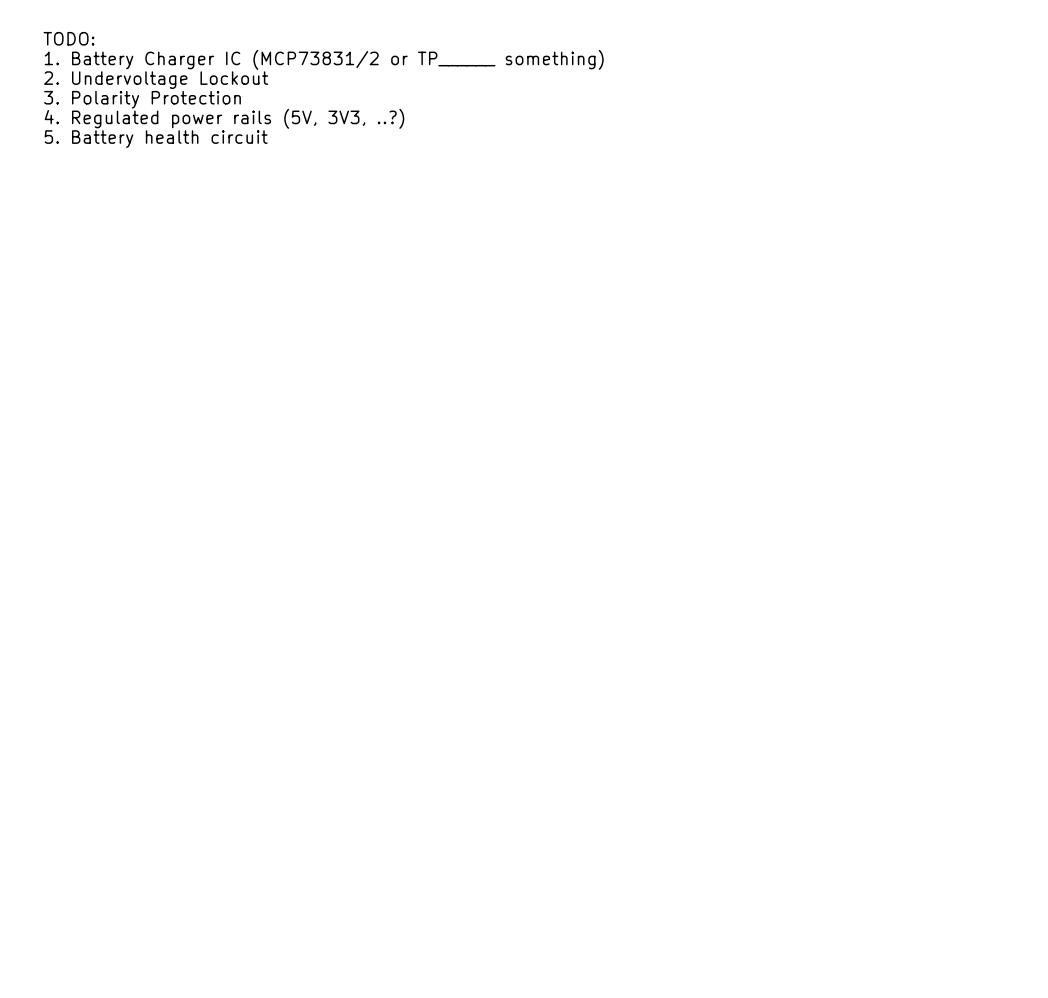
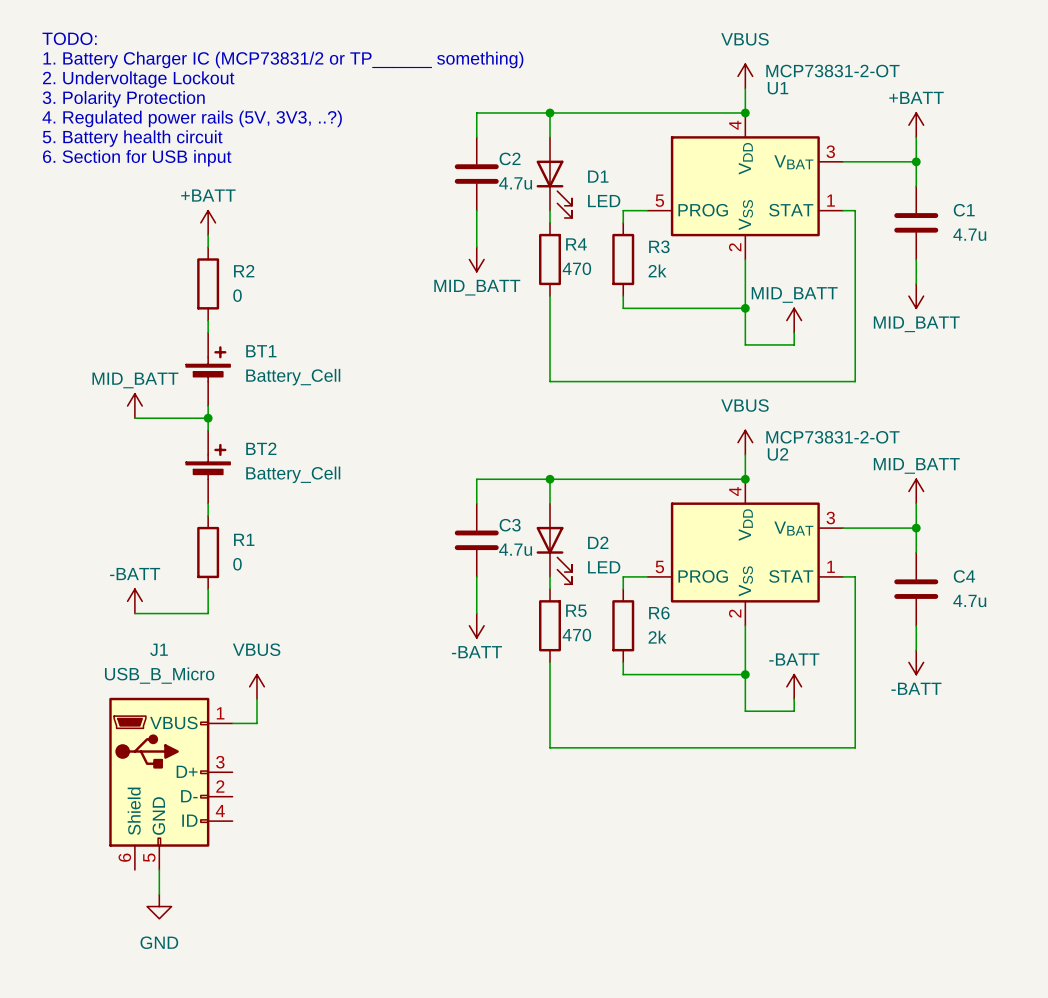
power symbol: none -> VBUS (745, 76)
wire: none -> (745, 88) (745, 112) (476, 112) (476, 137)
wire: none -> (550, 112) (550, 137)
junction: none -> (550, 112)
junction: none -> (745, 112)
power symbol: none -> +BATT (916, 125)
wire: none -> (916, 137) (916, 186)
text: none -> 6. Section for USB input (137, 158)
wire: none -> (843, 161) (916, 161)
junction: none -> (916, 161)
C2: none -> 4.7u (476, 174)
D1: none -> LED (554, 177)
U1: none -> MCP73831-2-OT (745, 186)
wire: none -> (476, 210) (476, 247)
wire: none -> (550, 210) (550, 222)
wire: none -> (647, 210) (623, 210) (623, 222)
wire: none -> (843, 210) (855, 210) (855, 381) (550, 381) (550, 296)
power symbol: none -> +BATT (208, 222)
C1: none -> 4.7u (916, 222)
wire: none -> (208, 235) (208, 247)
power symbol: none -> MID_BATT (476, 259)
R4: none -> 470 (550, 259)
R3: none -> 2k (623, 259)
wire: none -> (745, 259) (745, 344) (794, 344) (794, 332)
wire: none -> (916, 259) (916, 283)
R2: none -> 0 (208, 283)
wire: none -> (623, 296) (623, 308) (745, 308)
power symbol: none -> MID_BATT (916, 296)
junction: none -> (745, 308)
wire: none -> (208, 320) (208, 332)
power symbol: none -> MID_BATT (794, 320)
BT1: none -> Battery_Cell (208, 369)
power symbol: none -> MID_BATT (134, 406)
wire: none -> (208, 406) (208, 430)
wire: none -> (134, 418) (208, 418)
junction: none -> (208, 418)
power symbol: none -> VBUS (745, 442)
wire: none -> (745, 454) (745, 479) (476, 479) (476, 503)
BT2: none -> Battery_Cell (208, 467)
wire: none -> (550, 479) (550, 503)
junction: none -> (550, 479)
junction: none -> (745, 479)
power symbol: none -> MID_BATT (916, 491)
wire: none -> (208, 503) (208, 515)
wire: none -> (916, 503) (916, 552)
wire: none -> (843, 528) (916, 528)
junction: none -> (916, 528)
C3: none -> 4.7u (476, 540)
D2: none -> LED (554, 543)
R1: none -> 0 (208, 552)
U2: none -> MCP73831-2-OT (745, 552)
wire: none -> (476, 576) (476, 613)
wire: none -> (550, 576) (550, 589)
wire: none -> (647, 576) (623, 576) (623, 589)
wire: none -> (843, 576) (855, 576) (855, 747) (550, 747) (550, 662)
wire: none -> (208, 589) (208, 613) (134, 613)
C4: none -> 4.7u (916, 589)
power symbol: none -> -BATT (134, 601)
power symbol: none -> -BATT (476, 625)
R5: none -> 470 (550, 625)
R6: none -> 2k (623, 625)
wire: none -> (745, 625) (745, 711) (794, 711) (794, 699)
wire: none -> (916, 625) (916, 650)
wire: none -> (623, 662) (623, 674) (745, 674)
power symbol: none -> -BATT (916, 662)
junction: none -> (745, 674)
power symbol: none -> VBUS (256, 686)
power symbol: none -> -BATT (794, 686)
wire: none -> (256, 699) (256, 723) (232, 723)
J1: none -> USB_B_Micro (170, 783)
wire: none -> (159, 869) (159, 894)
power symbol: none -> GND (159, 906)

